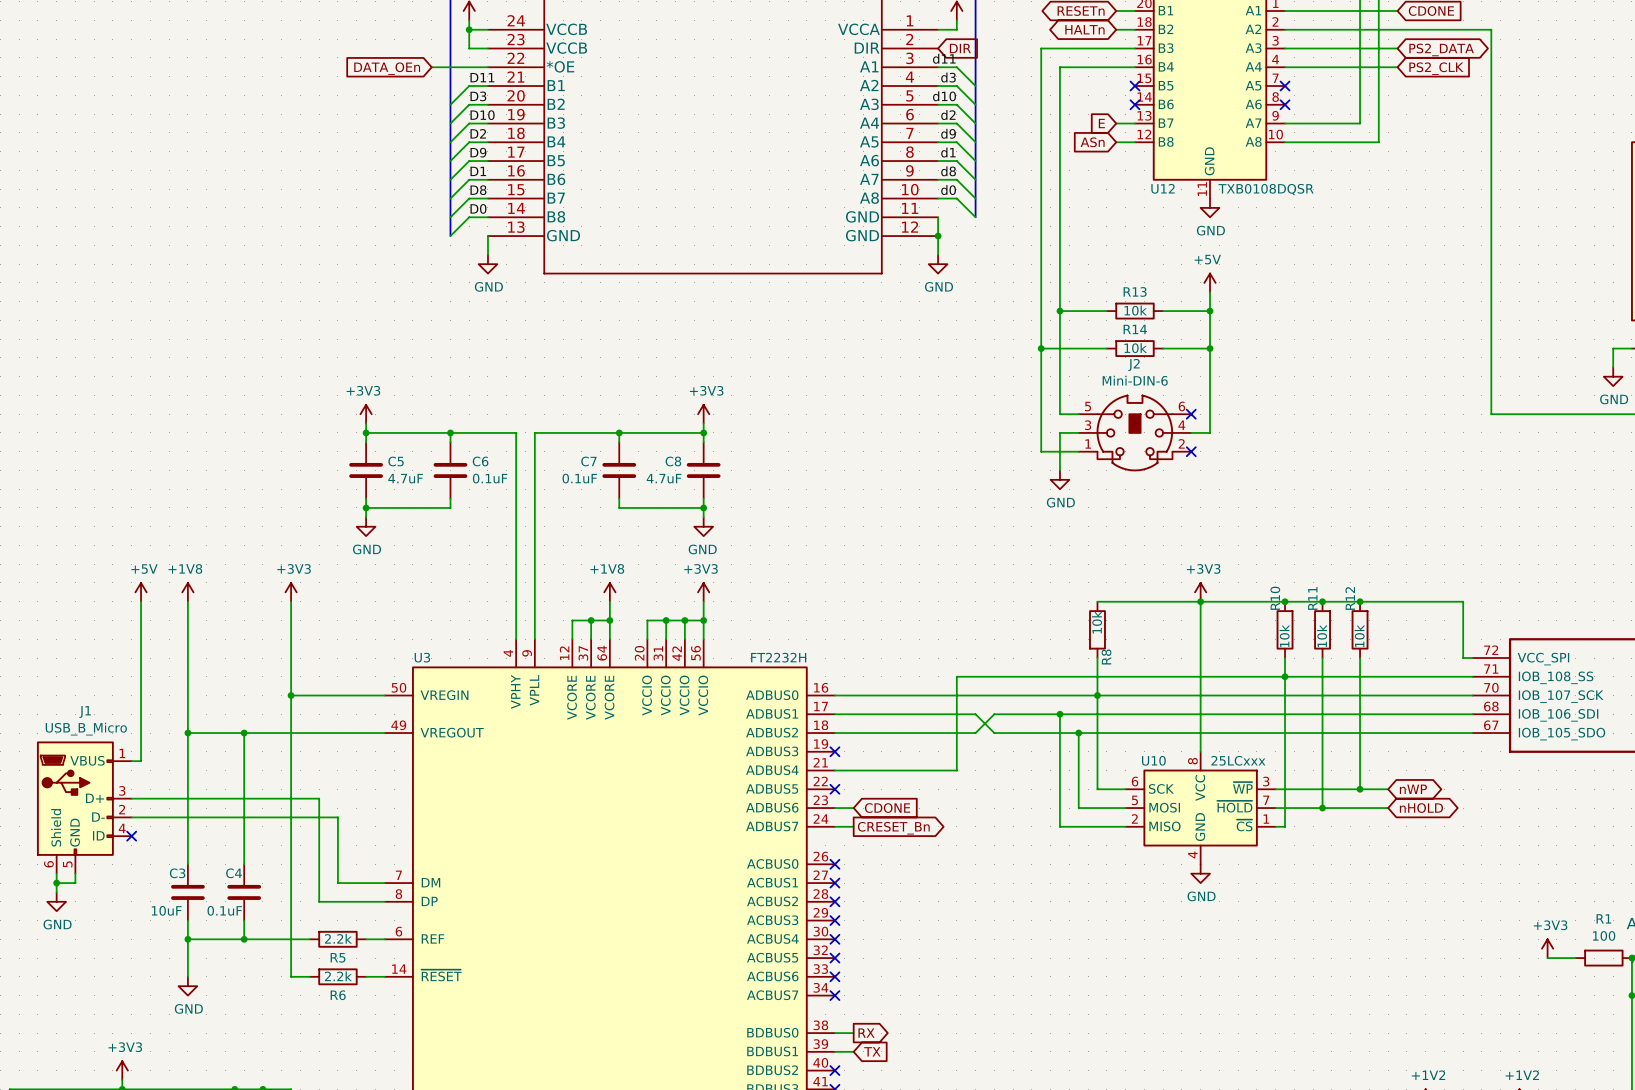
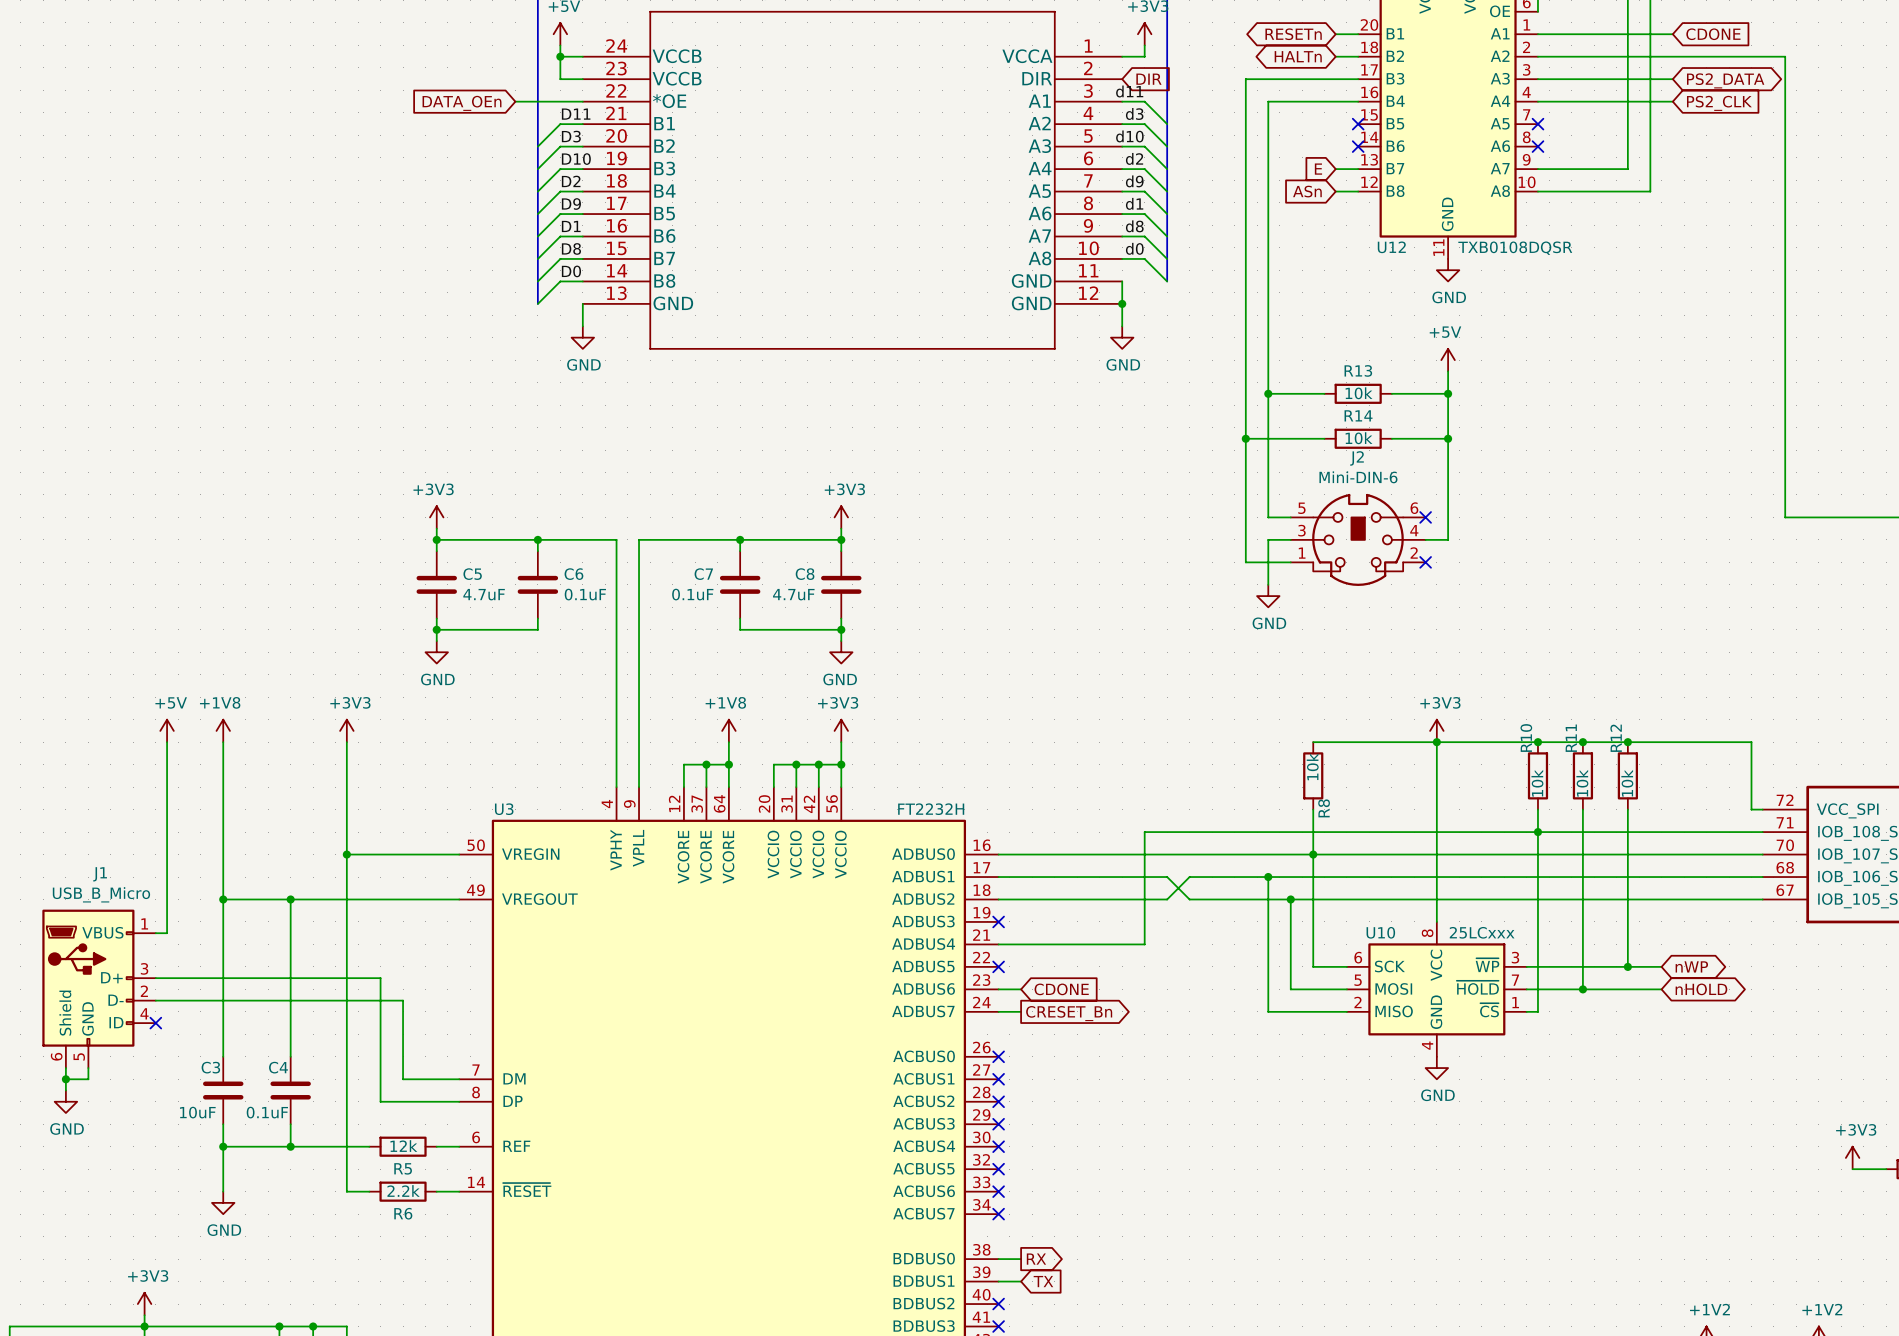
R5 value: 2.2k (338, 938) -> 12k (403, 1146)

